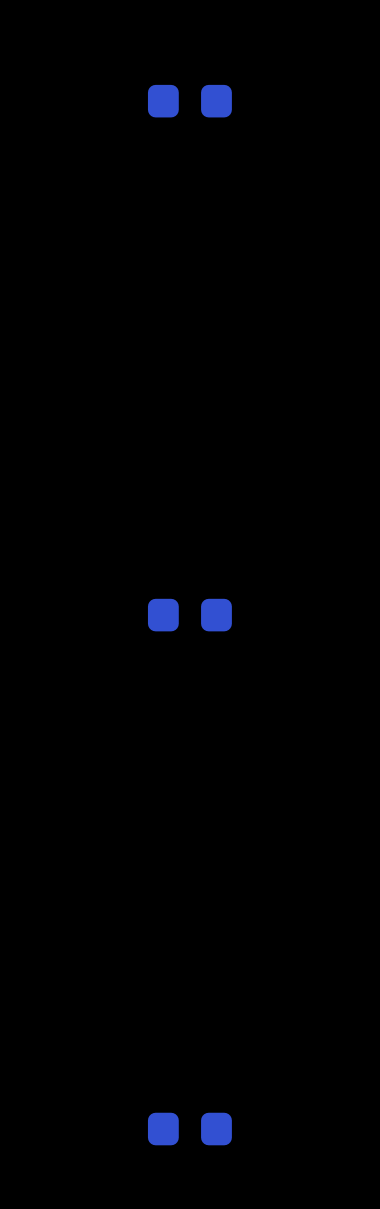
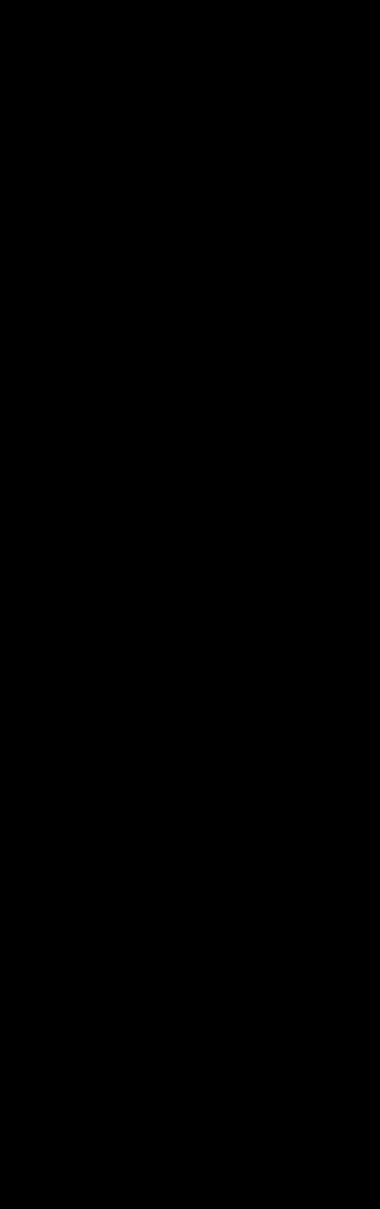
part: (189, 101) -> none
part: (189, 615) -> none
part: (189, 1129) -> none

